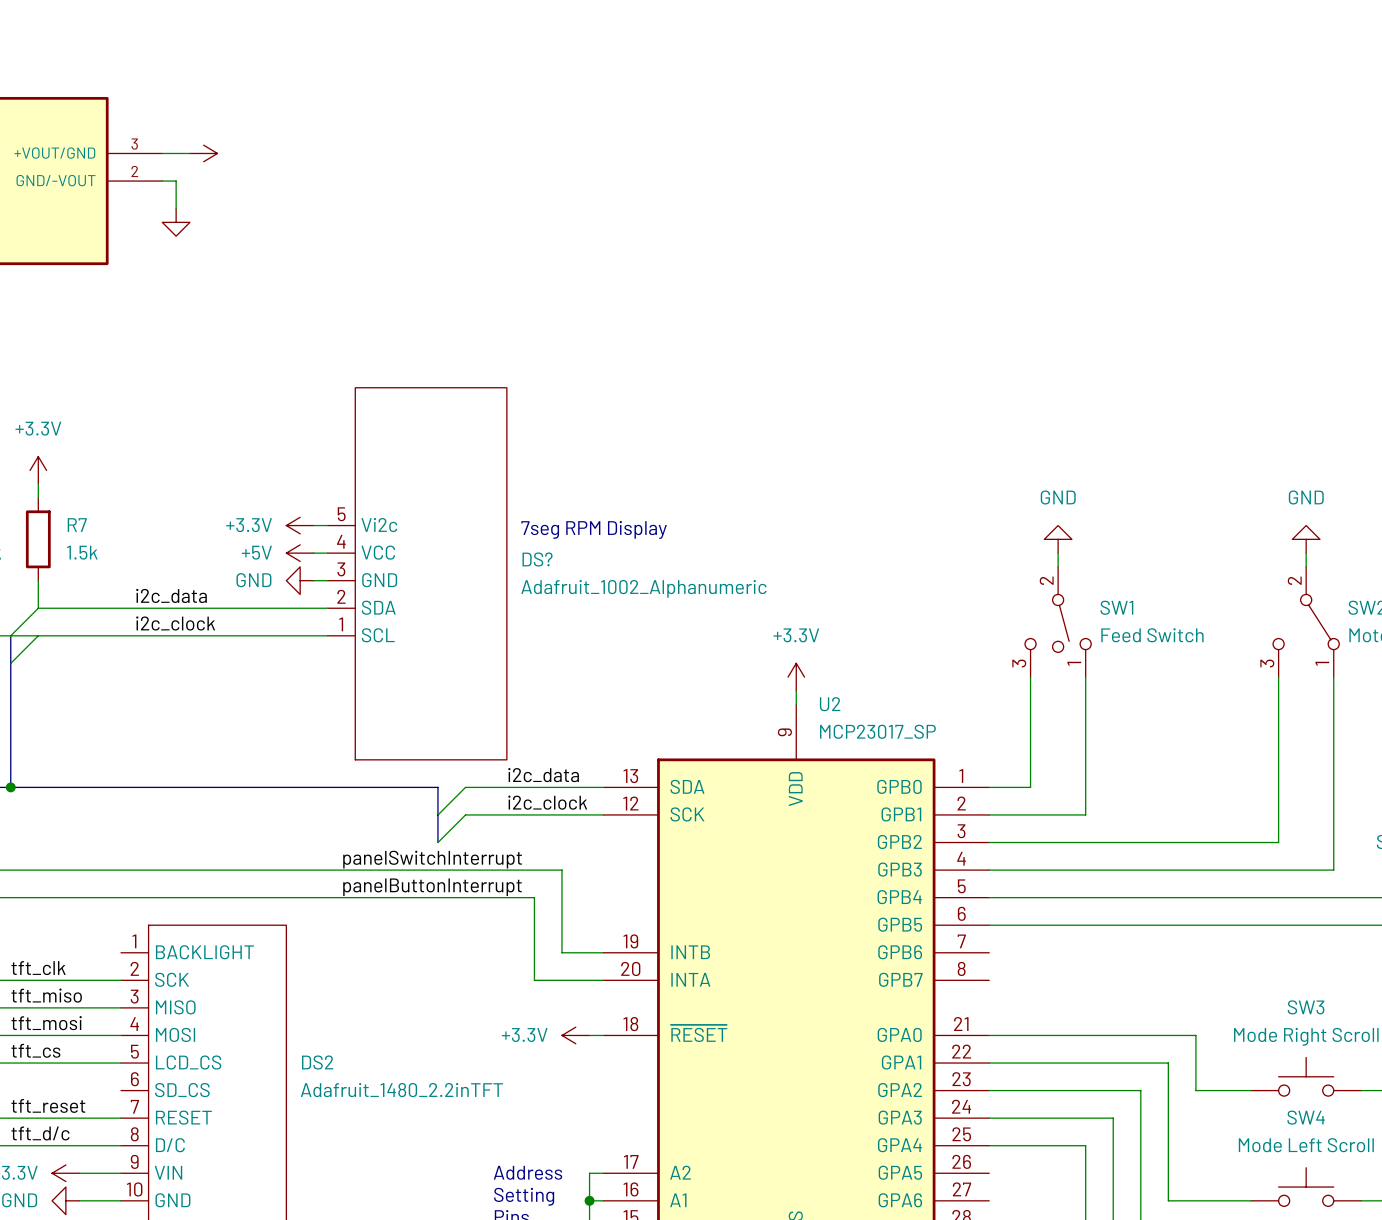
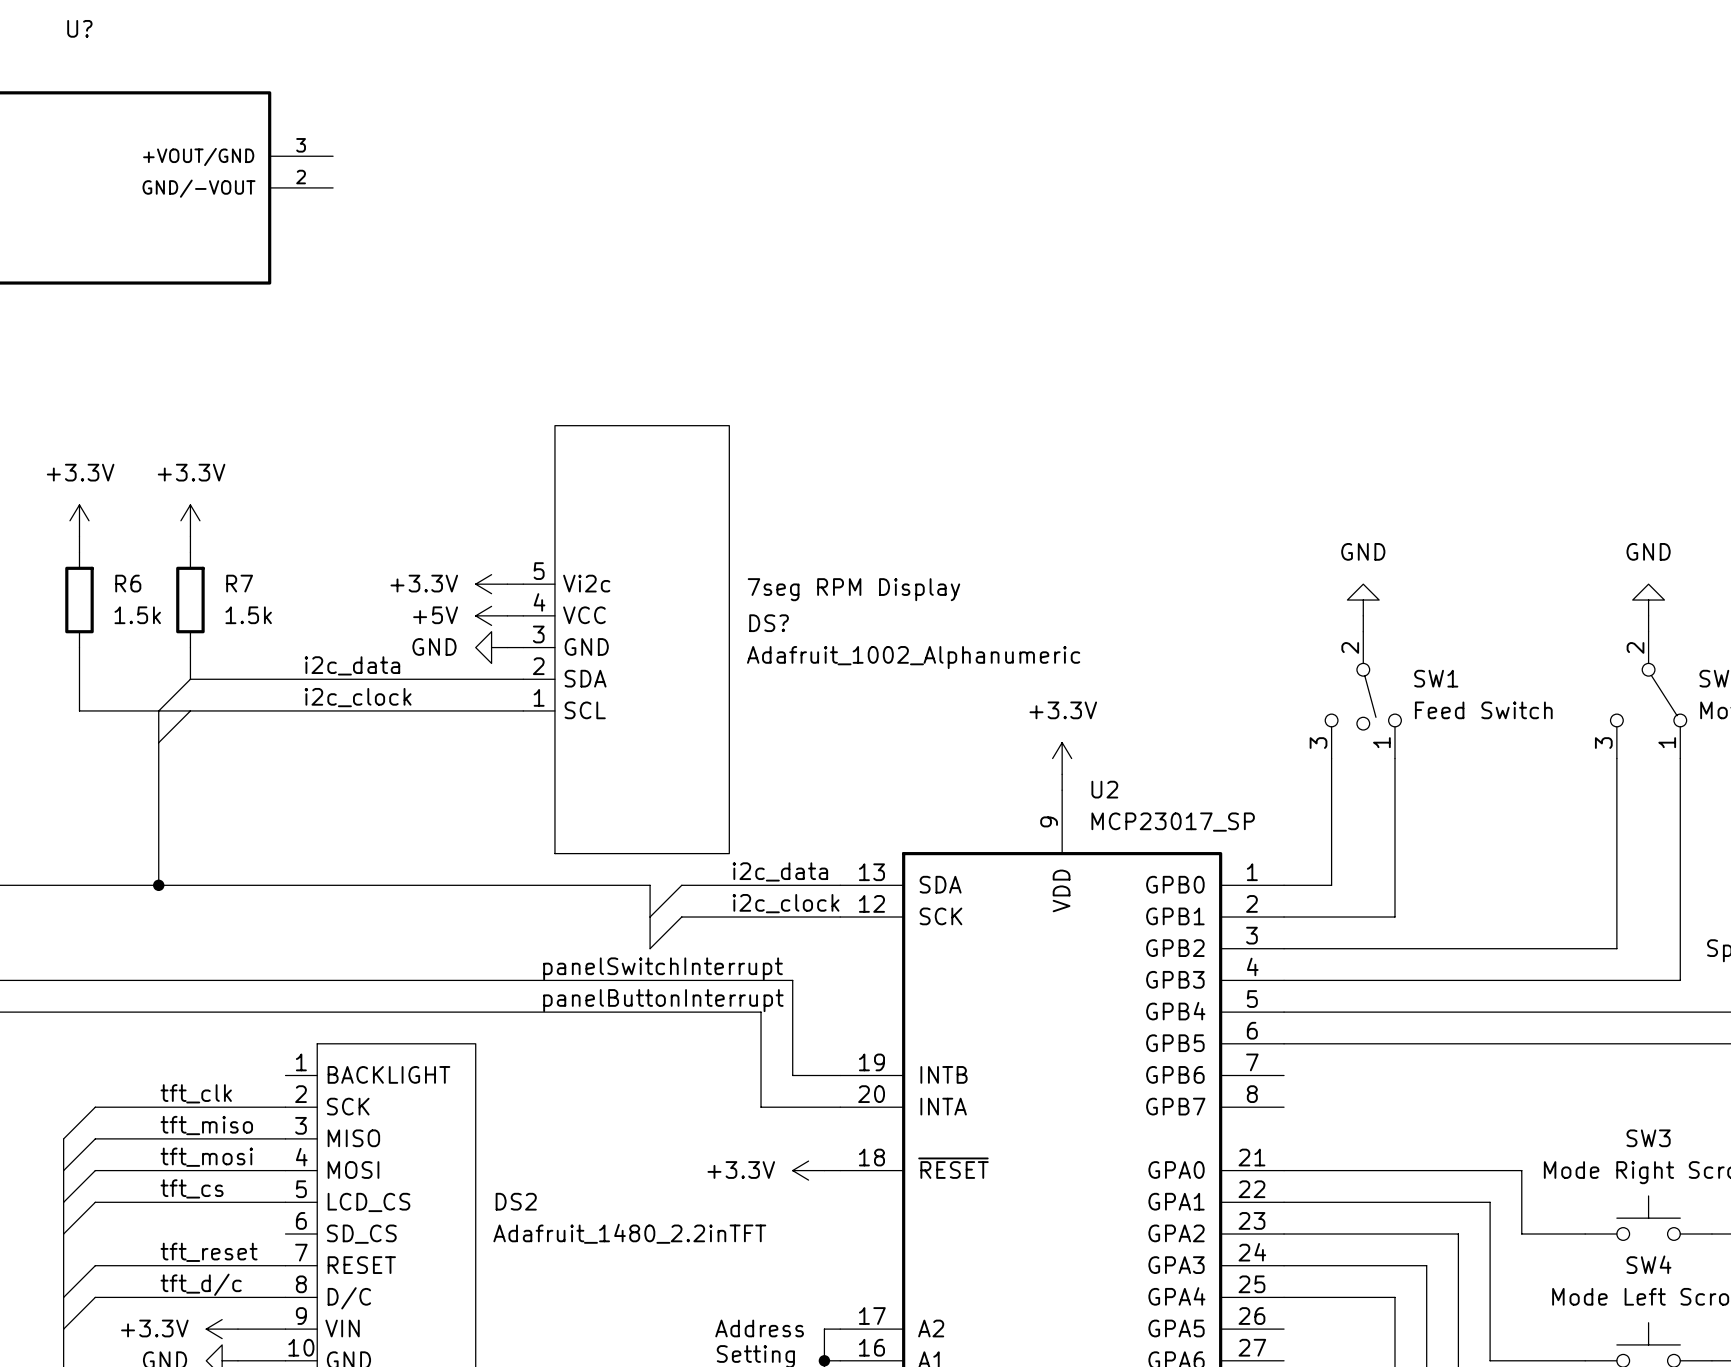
wire: (162, 153) (189, 153) -> none
power symbol: (203, 153) -> none
wire: (162, 181) (176, 181) (176, 208) -> none
power symbol: (176, 222) -> none

